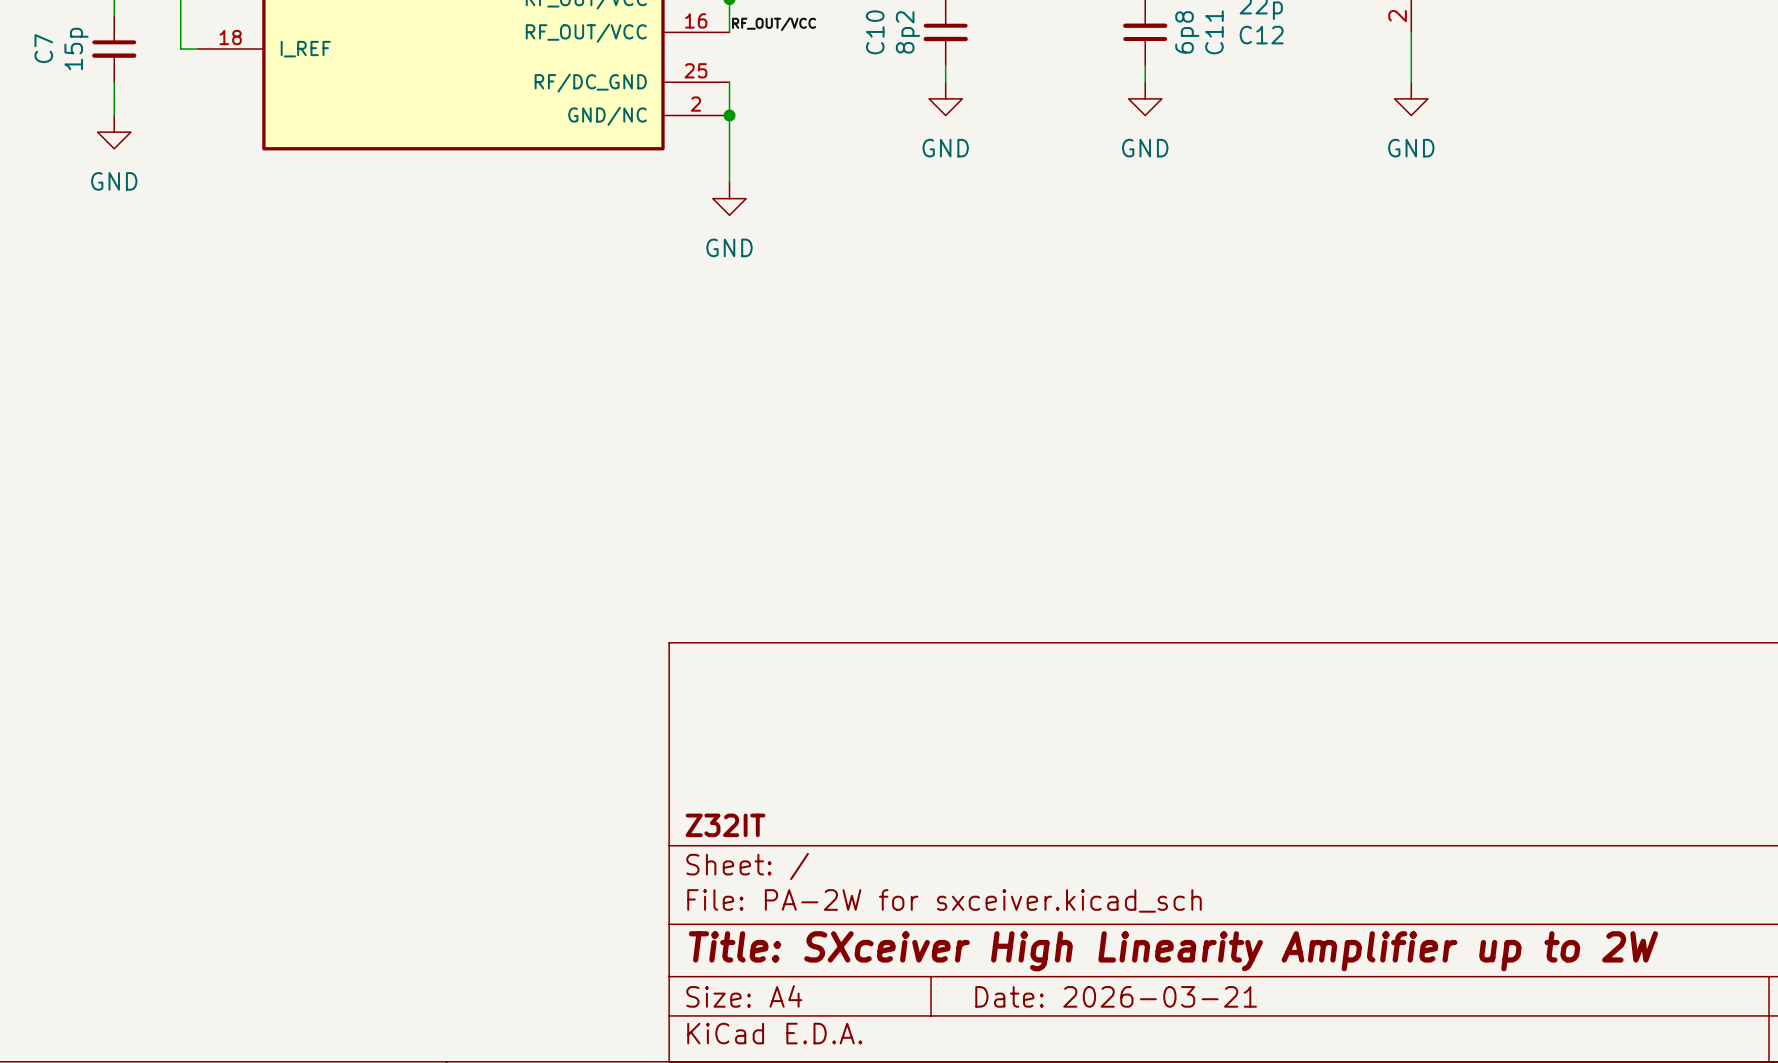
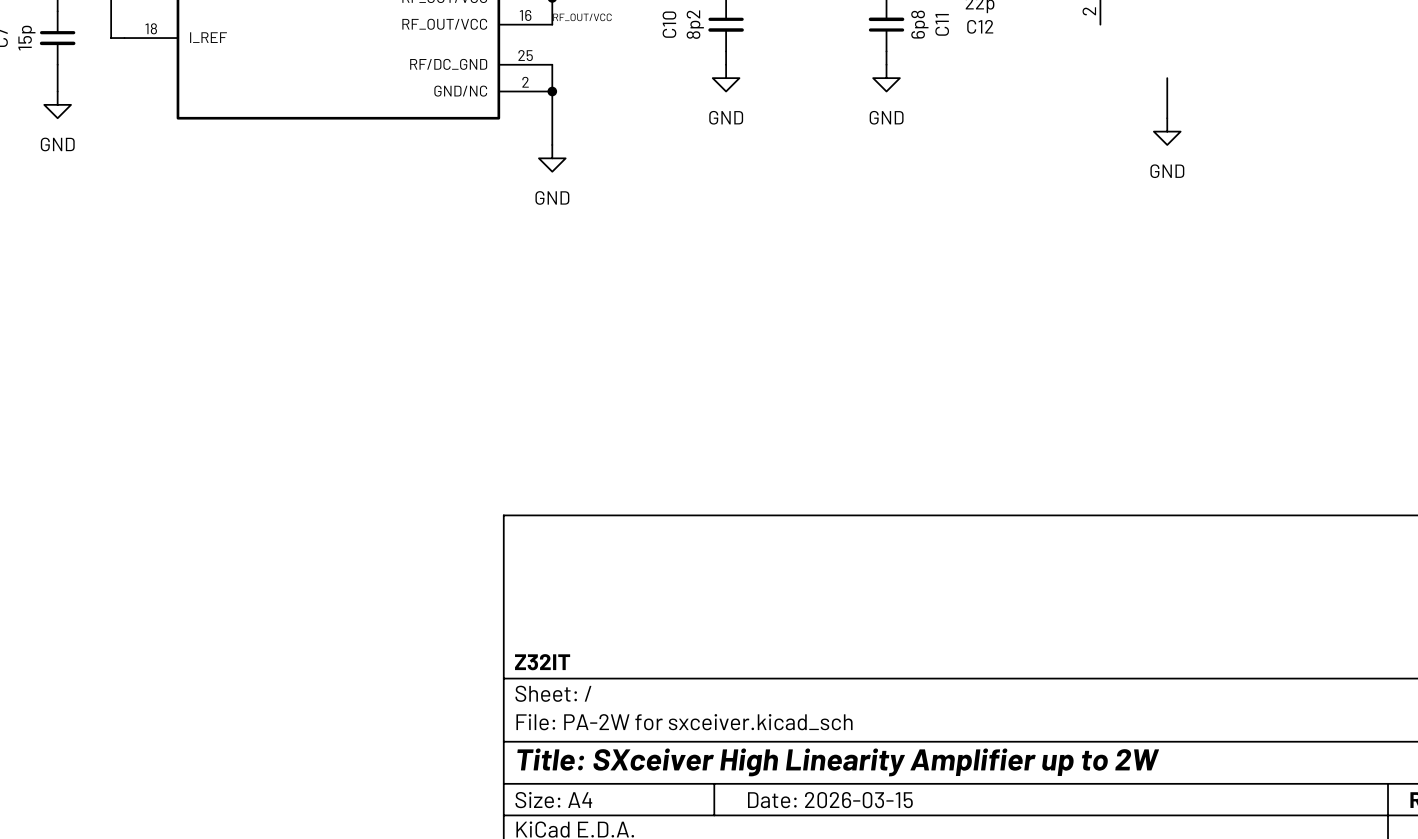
wire: (1411, 32) (1411, 82) -> (1167, 78) (1167, 118)
power symbol position: GND (1411, 98) -> GND (1167, 131)
title block: Date: 2026-03-21 (1116, 996) -> Date: 2026-03-15 (830, 800)

